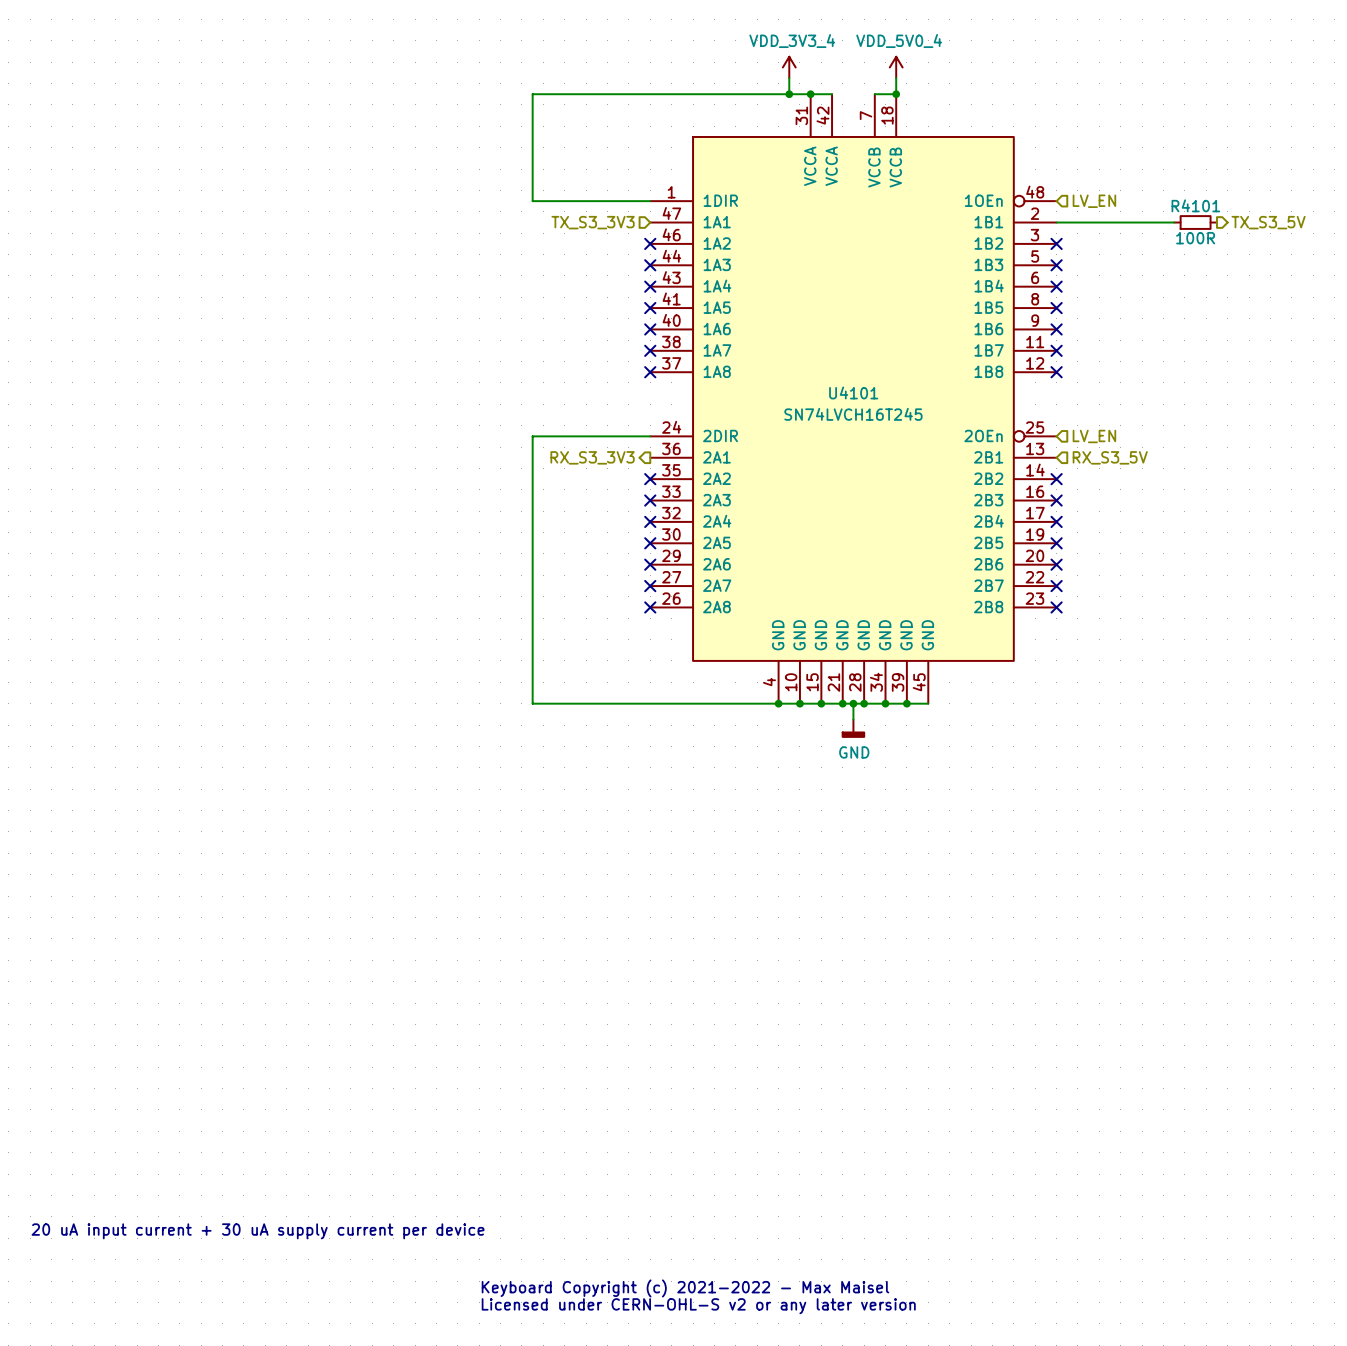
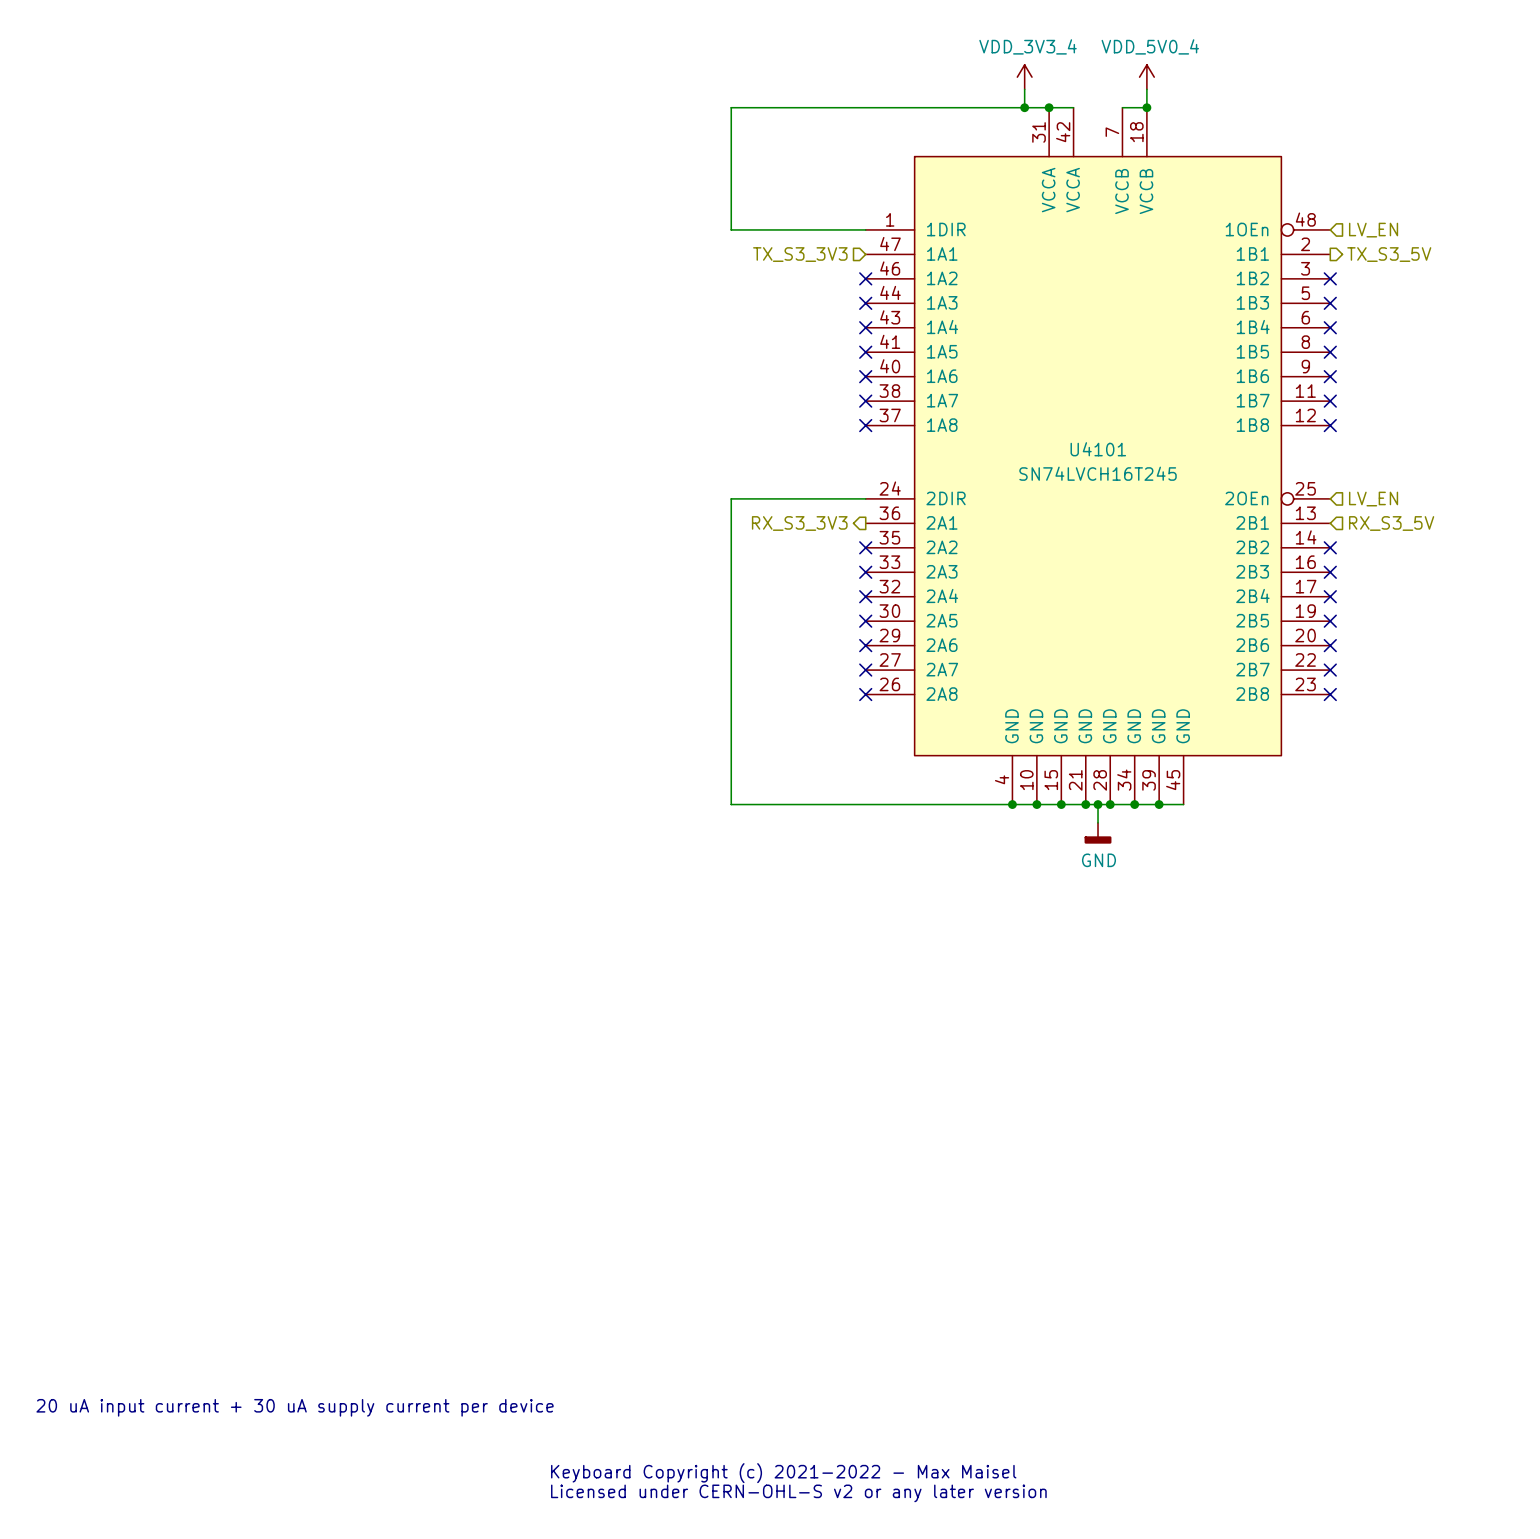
power symbol: VDD_3V3_4 (789, 67) -> none
power symbol: VDD_5V0_4 (896, 67) -> VDD_3V3_4 (1024, 77)
power symbol: none -> VDD_5V0_4 (1146, 77)
wire: (789, 78) (789, 94) -> none
wire: none -> (1146, 89) (1146, 107) (1122, 107)
wire: (639, 94) (532, 94) (532, 201) (639, 201) -> (731, 107) (731, 229)
junction: (789, 94) -> none
junction: (810, 94) -> none
wire: none -> (951, 107) (1000, 107)
wire: none -> (1024, 107) (1073, 107)
junction: none -> (1049, 107)
junction: none -> (1146, 107)
hierarchical label position: LV_EN (1094, 201) -> LV_EN (1373, 230)
hierarchical label position: TX_S3_3V3 (593, 222) -> TX_S3_3V3 (800, 254)
R4101: 100R (1195, 222) -> none
hierarchical label position: TX_S3_5V (1268, 222) -> TX_S3_5V (1389, 254)
no-connect mark: (650, 243) -> none
no-connect mark: none -> (865, 278)
no-connect mark: (1056, 243) -> none
no-connect mark: none -> (1330, 278)
no-connect mark: (650, 265) -> none
no-connect mark: none -> (865, 303)
no-connect mark: (1056, 265) -> none
no-connect mark: none -> (1330, 303)
no-connect mark: (650, 286) -> none
no-connect mark: none -> (865, 327)
no-connect mark: (1056, 286) -> none
no-connect mark: none -> (1330, 327)
no-connect mark: (650, 308) -> none
no-connect mark: none -> (865, 352)
no-connect mark: (1056, 308) -> none
no-connect mark: none -> (1330, 352)
no-connect mark: (650, 329) -> none
no-connect mark: none -> (865, 376)
no-connect mark: (1056, 329) -> none
no-connect mark: none -> (1330, 376)
no-connect mark: (650, 350) -> none
no-connect mark: none -> (865, 401)
no-connect mark: (1056, 350) -> none
no-connect mark: none -> (1330, 401)
no-connect mark: (650, 372) -> none
no-connect mark: none -> (865, 425)
no-connect mark: (1056, 372) -> none
no-connect mark: none -> (1330, 425)
U4101 position: (853, 398) -> (1098, 456)
wire: (639, 436) (532, 436) (532, 703) (639, 703) -> (731, 498) (731, 804)
hierarchical label position: LV_EN (1094, 436) -> LV_EN (1373, 499)
hierarchical label position: RX_S3_3V3 (592, 457) -> RX_S3_3V3 (799, 523)
hierarchical label position: RX_S3_5V (1110, 457) -> RX_S3_5V (1391, 523)
no-connect mark: (650, 479) -> none
no-connect mark: none -> (865, 547)
no-connect mark: (1056, 479) -> none
no-connect mark: none -> (1330, 547)
no-connect mark: (650, 500) -> none
no-connect mark: none -> (865, 572)
no-connect mark: (1056, 500) -> none
no-connect mark: none -> (1330, 572)
no-connect mark: (650, 521) -> none
no-connect mark: none -> (865, 596)
no-connect mark: (1056, 521) -> none
no-connect mark: none -> (1330, 596)
no-connect mark: (650, 543) -> none
no-connect mark: none -> (865, 621)
no-connect mark: (1056, 543) -> none
no-connect mark: none -> (1330, 621)
no-connect mark: (650, 564) -> none
no-connect mark: none -> (865, 645)
no-connect mark: (1056, 564) -> none
no-connect mark: none -> (1330, 645)
no-connect mark: (650, 586) -> none
no-connect mark: none -> (865, 670)
no-connect mark: (1056, 586) -> none
no-connect mark: none -> (1330, 670)
no-connect mark: (650, 607) -> none
no-connect mark: none -> (865, 694)
no-connect mark: (1056, 607) -> none
no-connect mark: none -> (1330, 694)
junction: (778, 703) -> none
junction: (799, 703) -> none
junction: (821, 703) -> none
junction: (842, 703) -> none
wire: (853, 703) (853, 719) -> (1098, 804) (1098, 822)
junction: (853, 703) -> none
junction: (864, 703) -> none
wire: none -> (1061, 804) (1183, 804)
junction: none -> (1061, 804)
junction: none -> (1085, 804)
junction: none -> (1098, 804)
junction: none -> (1110, 804)
junction: none -> (1134, 804)
junction: none -> (1159, 804)
power symbol position: GND (853, 728) -> GND (1098, 833)

